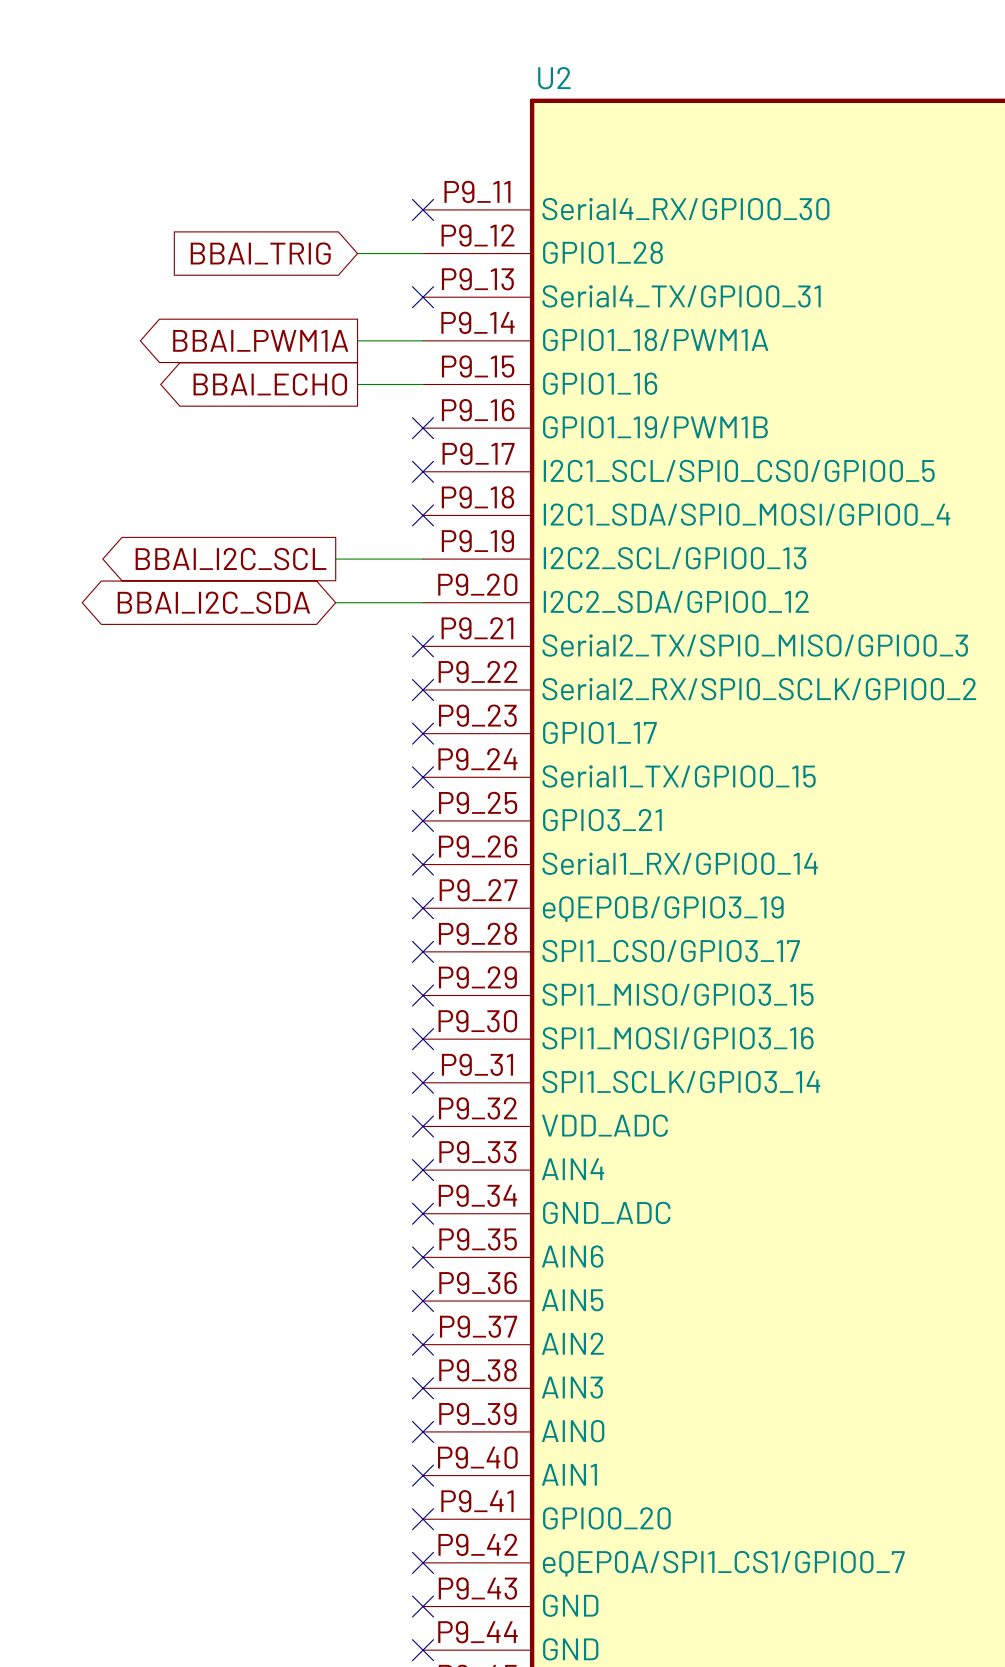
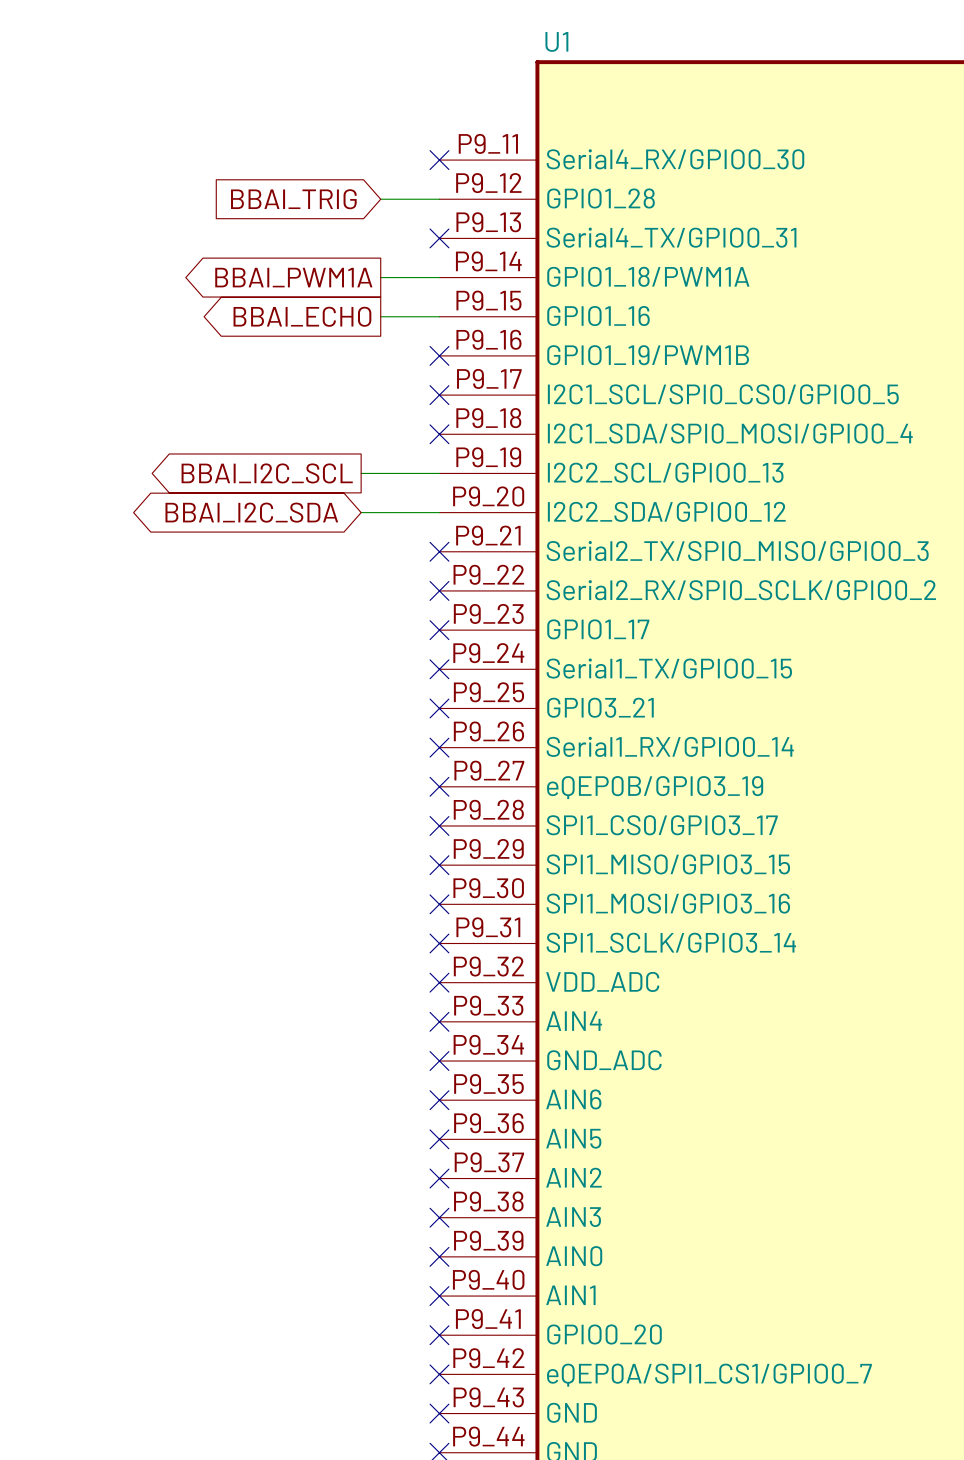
U2 name: U2 (554, 78) -> U1 (556, 41)

